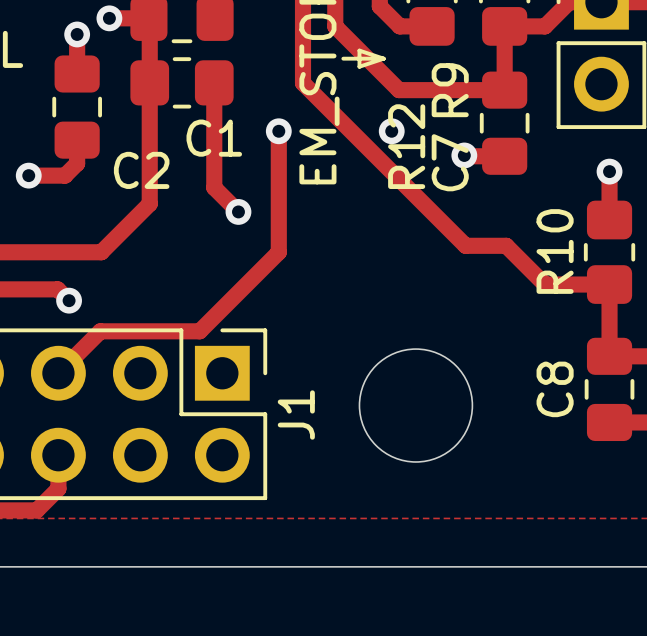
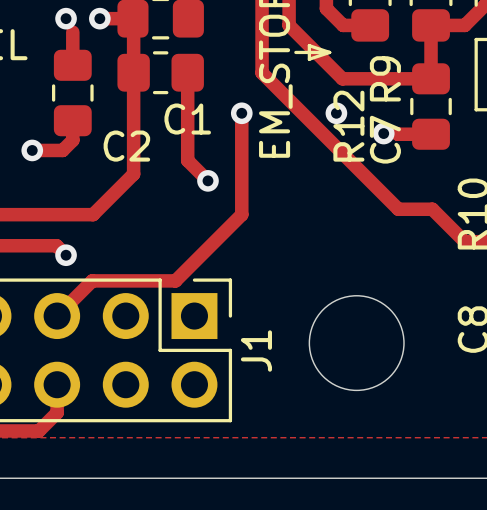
via position: (77, 34) -> (66, 18)
via position: (464, 155) -> (383, 133)

